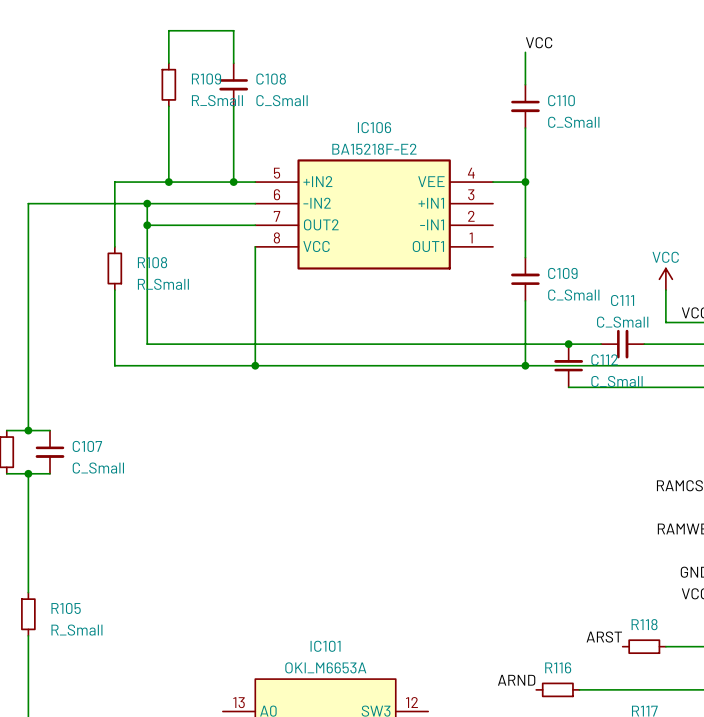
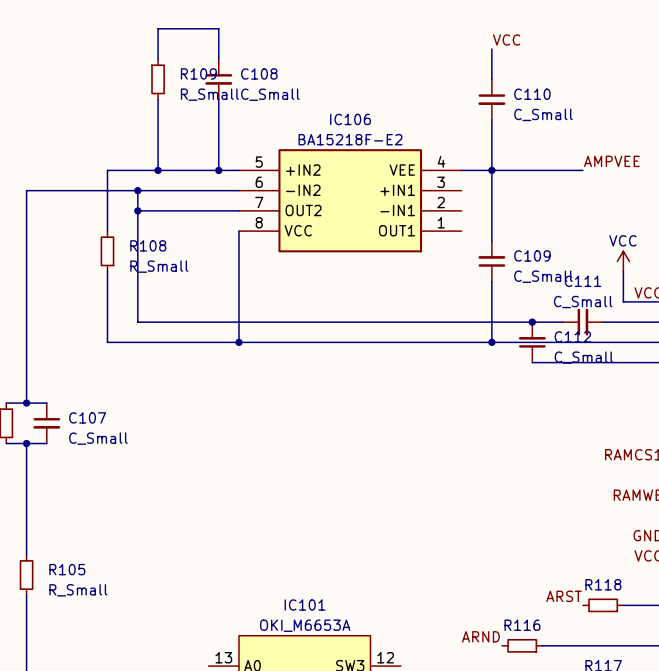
label: none -> AMPVEE (611, 161)
wire: none -> (491, 170) (582, 170)

